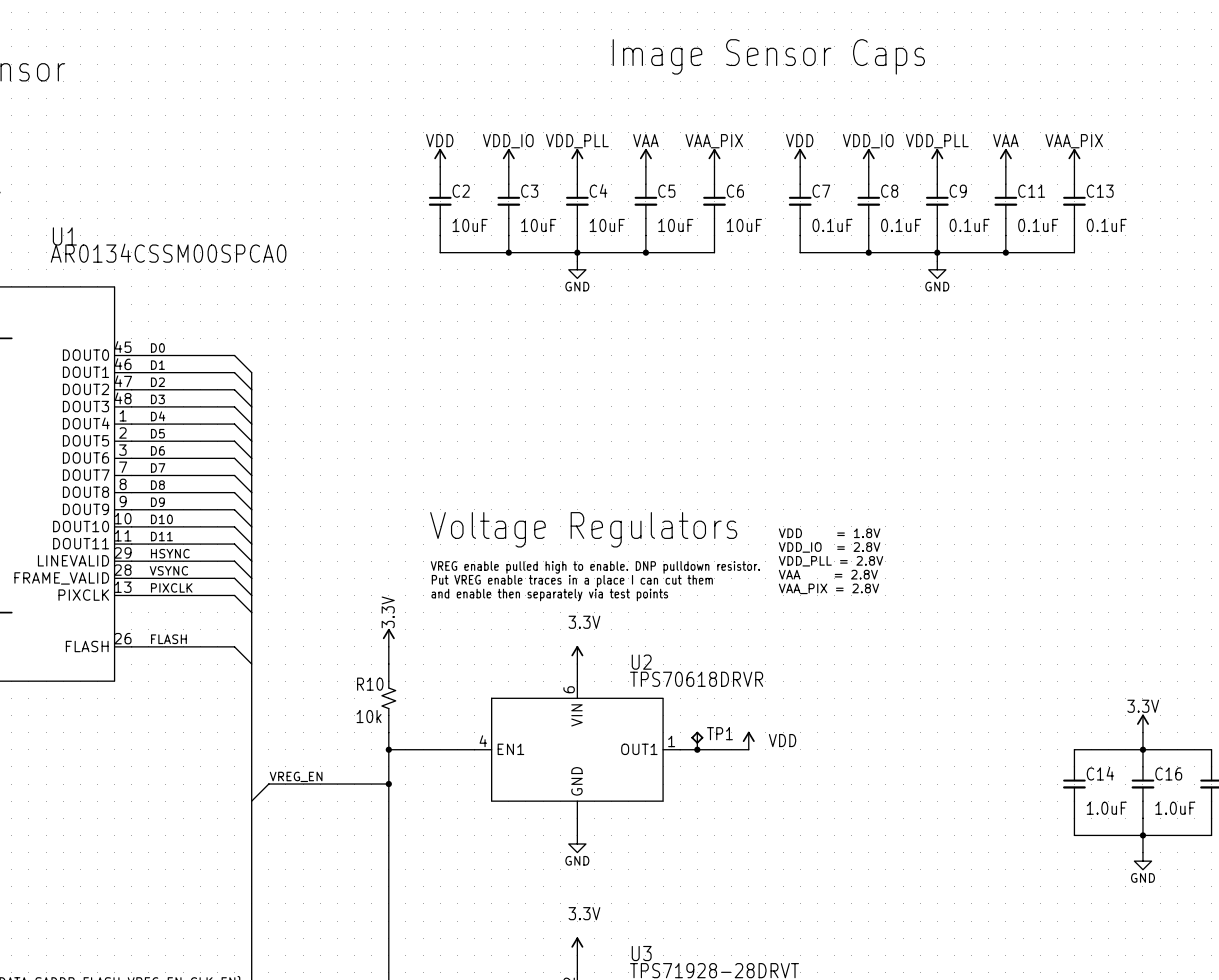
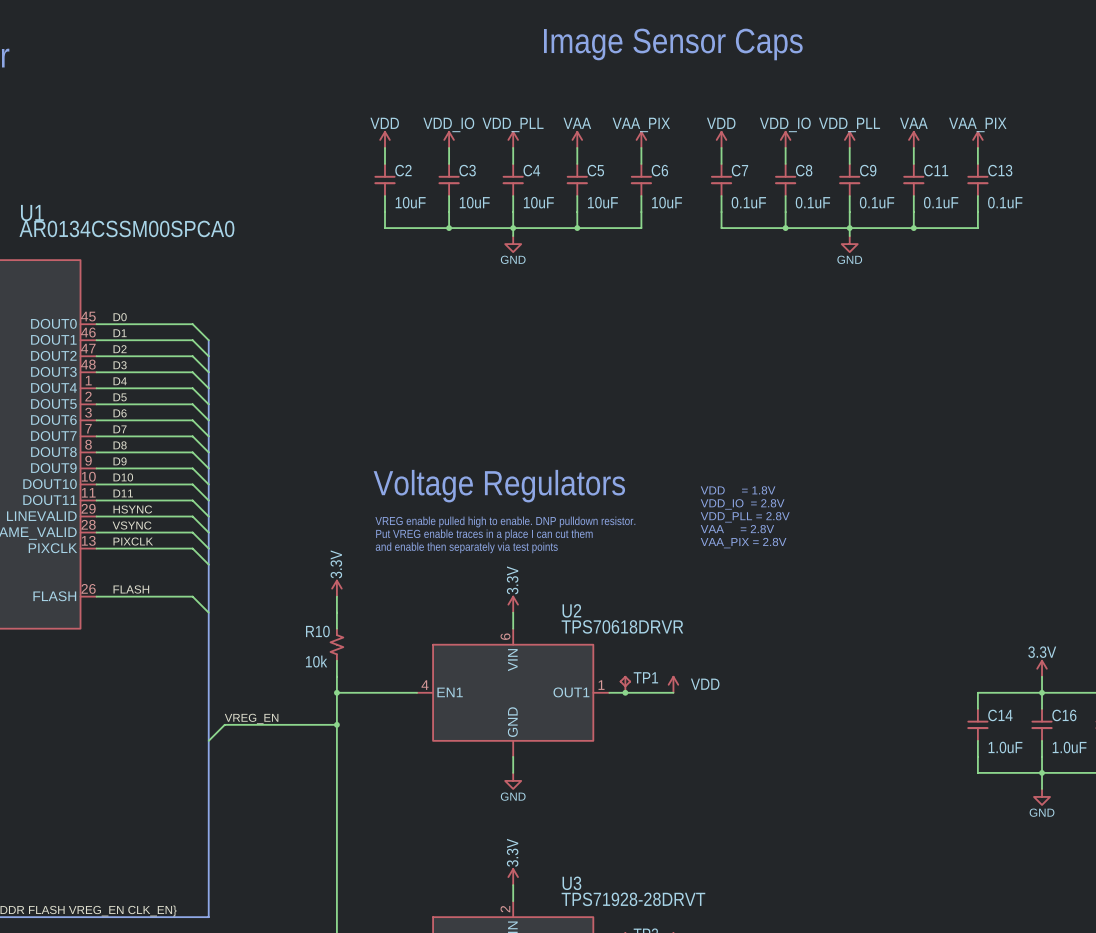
power symbol text rotation: 0° (584, 622) -> 90° counterclockwise (512, 580)
power symbol text rotation: 0° (584, 913) -> 90° counterclockwise (512, 852)

